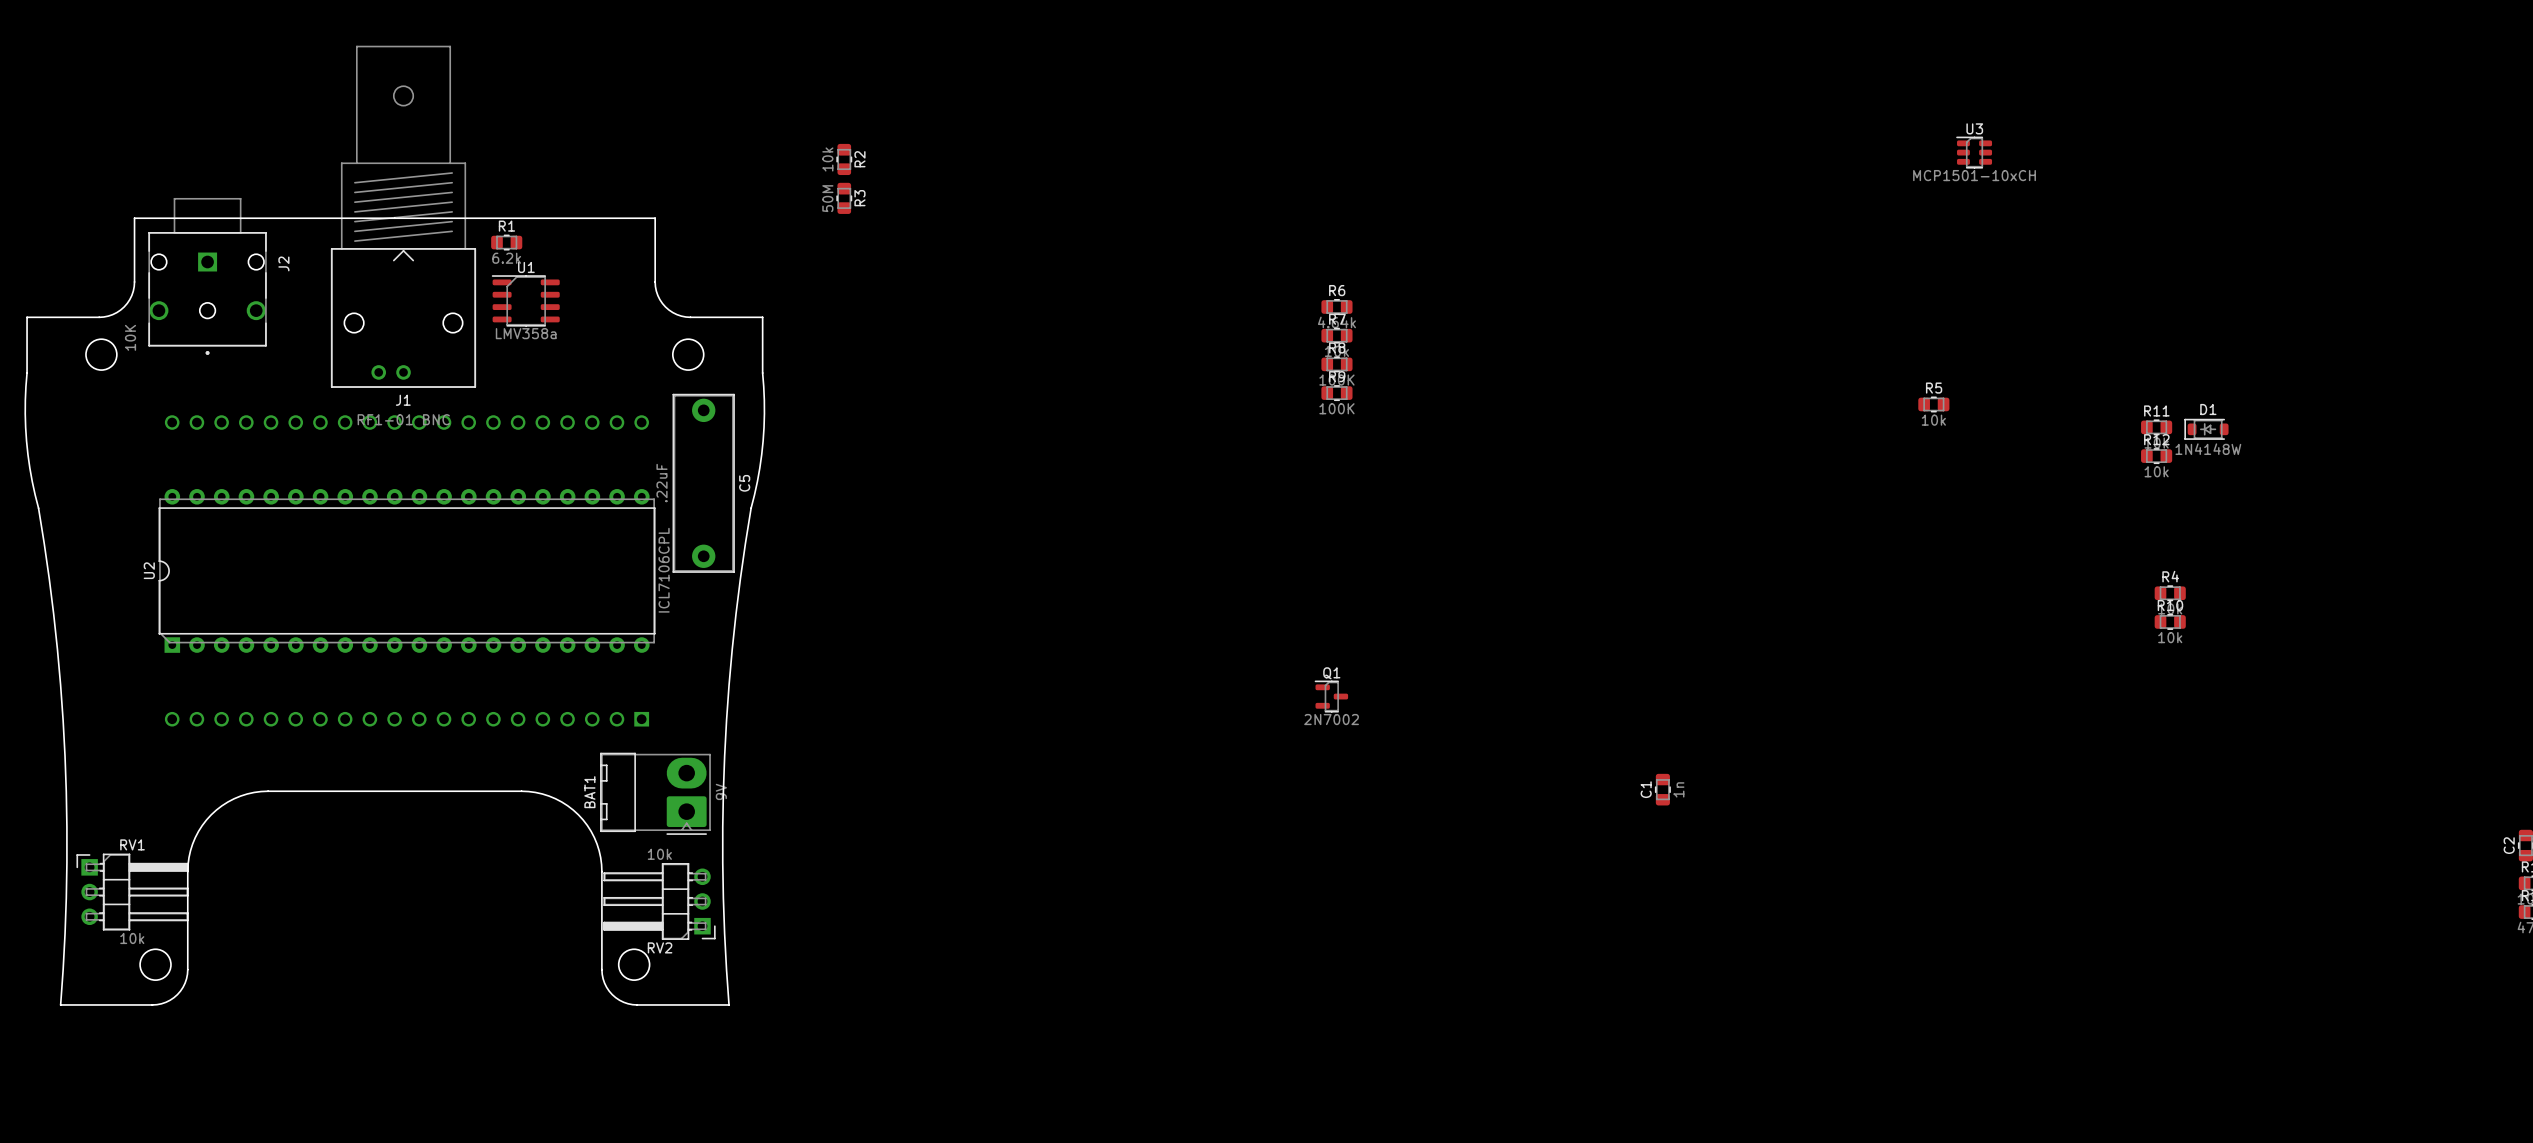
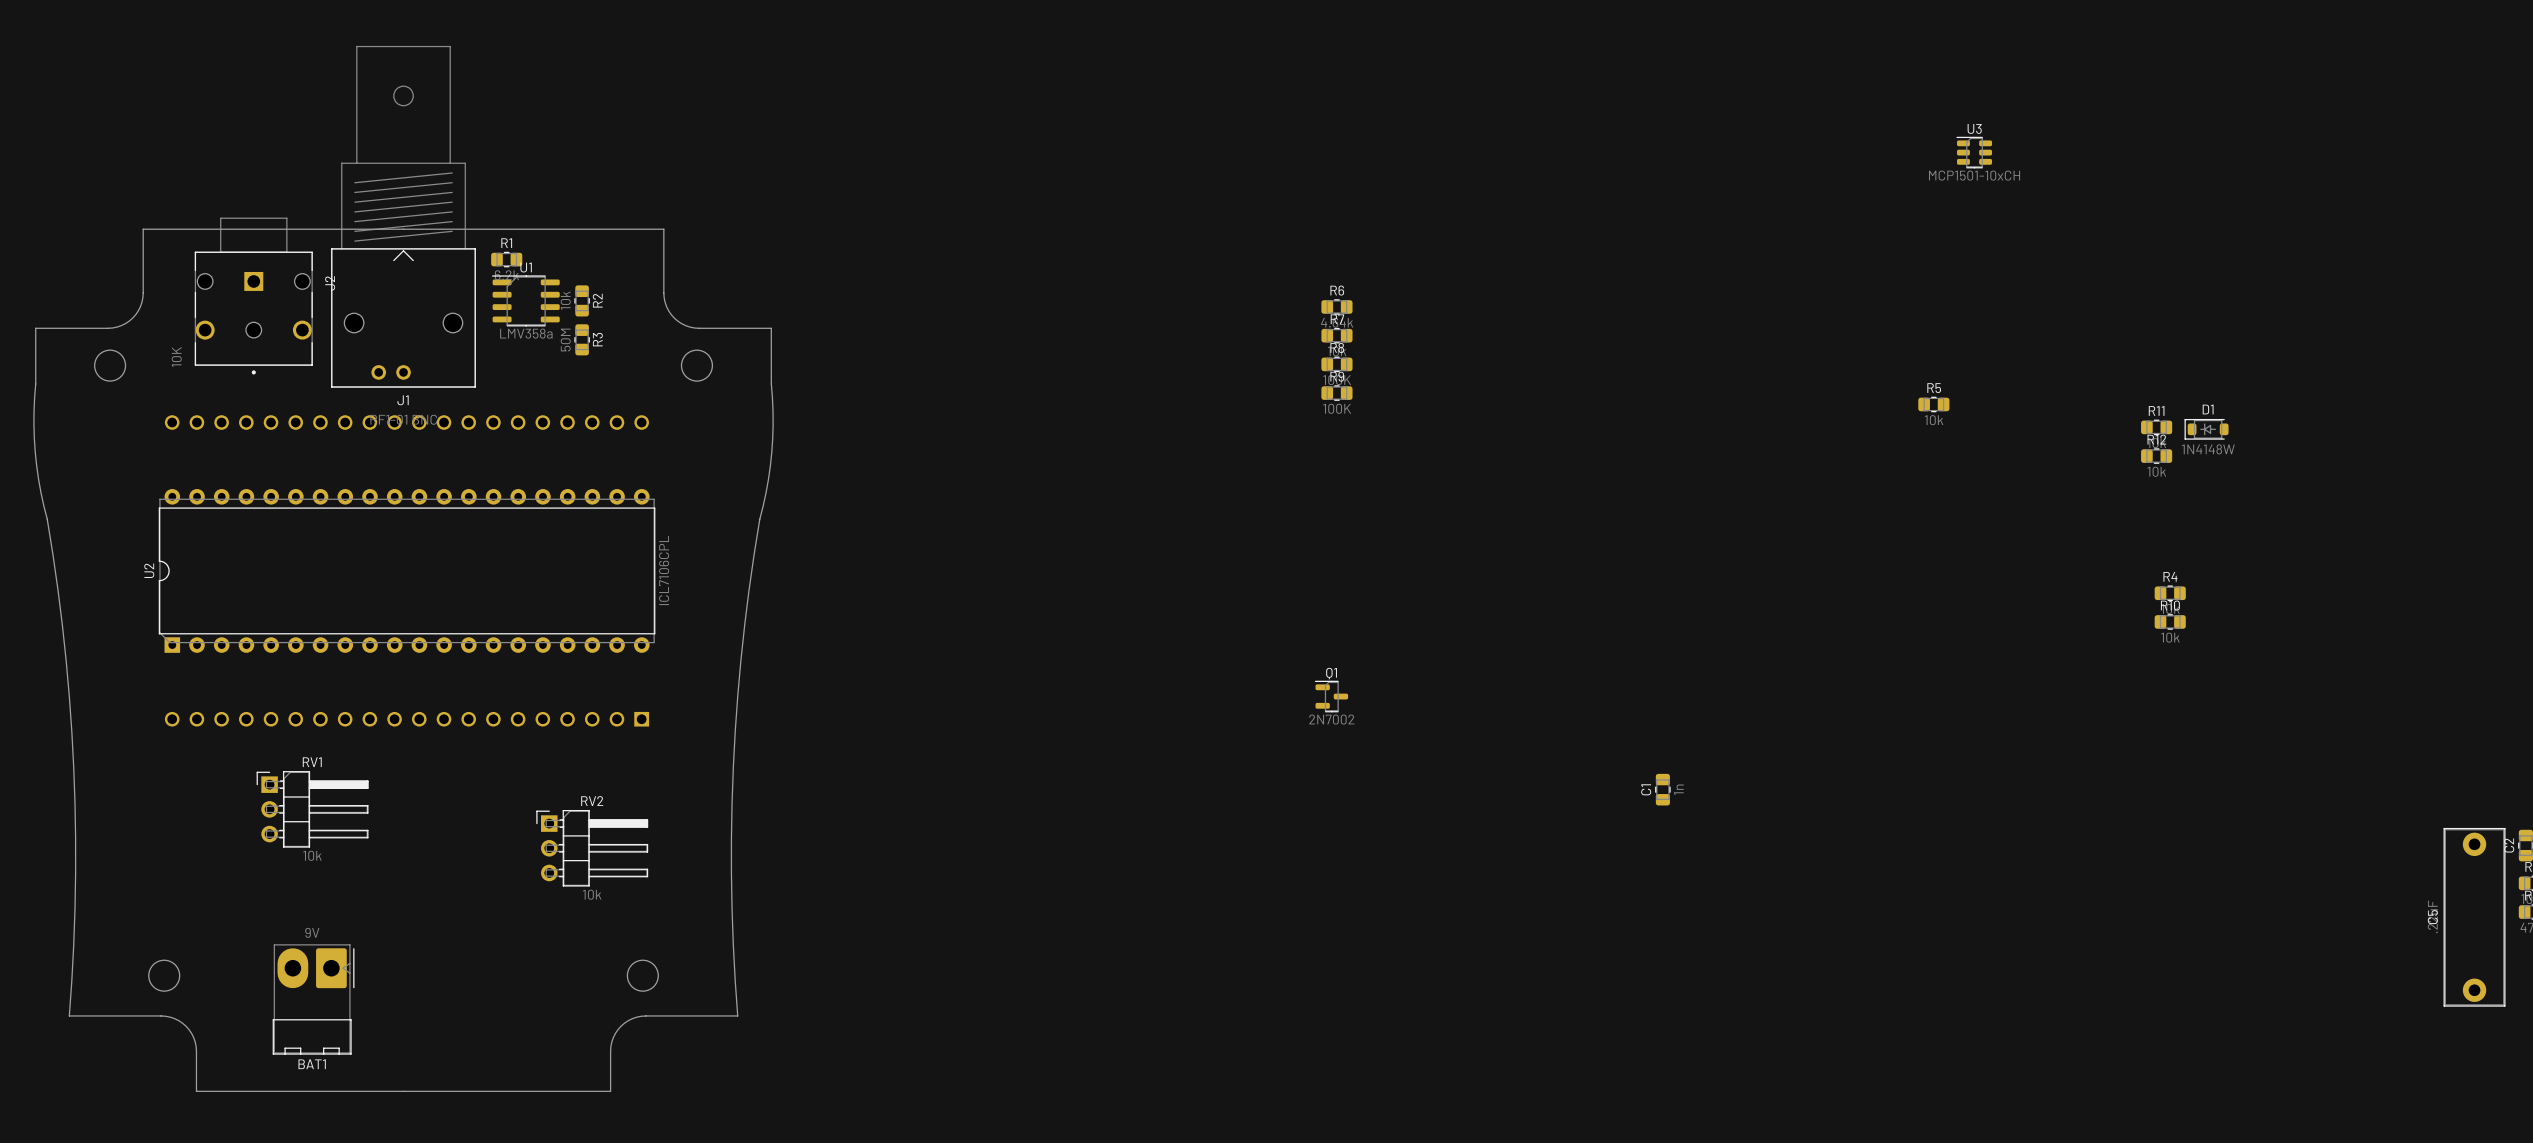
R2 position: (844, 159) -> (582, 300)
R3 position: (844, 198) -> (582, 339)
board edge: (134, 218) (134, 286) (129, 299) (124, 306) (112, 314) (103, 317) (27, 317) (26, 441) (44, 543) (53, 613) (65, 755) (66, 898) (60, 1004) (157, 1004) (170, 1000) (177, 994) (185, 983) (187, 974) (188, 864) (195, 837) (206, 819) (227, 802) (247, 793) (268, 791) (521, 791) (535, 792) (555, 798) (567, 805) (583, 819) (591, 831) (599, 850) (601, 871) (602, 974) (609, 991) (619, 1000) (632, 1004) (729, 1004) (722, 862) (724, 755) (736, 613) (745, 543) (763, 441) (762, 317) (685, 317) (672, 312) (665, 306) (659, 299) (655, 286) (655, 218) (134, 218) -> (143, 229) (142, 297) (140, 306) (132, 317) (125, 323) (112, 328) (35, 328) (35, 452) (52, 554) (62, 624) (73, 766) (74, 909) (69, 1015) (161, 1015) (178, 1020) (189, 1029) (195, 1042) (196, 1091) (610, 1091) (611, 1042) (617, 1029) (628, 1020) (645, 1015) (737, 1015) (732, 909) (733, 766) (744, 624) (754, 554) (771, 452) (771, 328) (694, 328) (681, 323) (674, 317) (666, 306) (664, 297) (663, 229) (143, 229)
R1 position: (506, 242) -> (506, 259)
J2 position: (207, 276) -> (253, 295)
round board edge: [85, 338, 118, 371] -> none
round board edge: [672, 338, 705, 371] -> none
round board edge: none -> [94, 350, 126, 382]
round board edge: none -> [681, 350, 713, 382]
C5 position: (703, 483) -> (2474, 917)
C5 name position: C5 (744, 483) -> C5 (2432, 917)
BAT1 rotation: 0° (655, 793) -> 90° counterclockwise (313, 999)
BAT1 position: (655, 793) -> (313, 999)
RV1 position: (132, 892) -> (312, 809)
RV2 rotation: 0° (659, 901) -> 180° (592, 848)
RV2 position: (659, 901) -> (592, 848)
round board edge: [139, 948, 172, 981] -> none
round board edge: [618, 948, 651, 981] -> none
round board edge: none -> [148, 960, 180, 992]
round board edge: none -> [627, 960, 659, 992]

